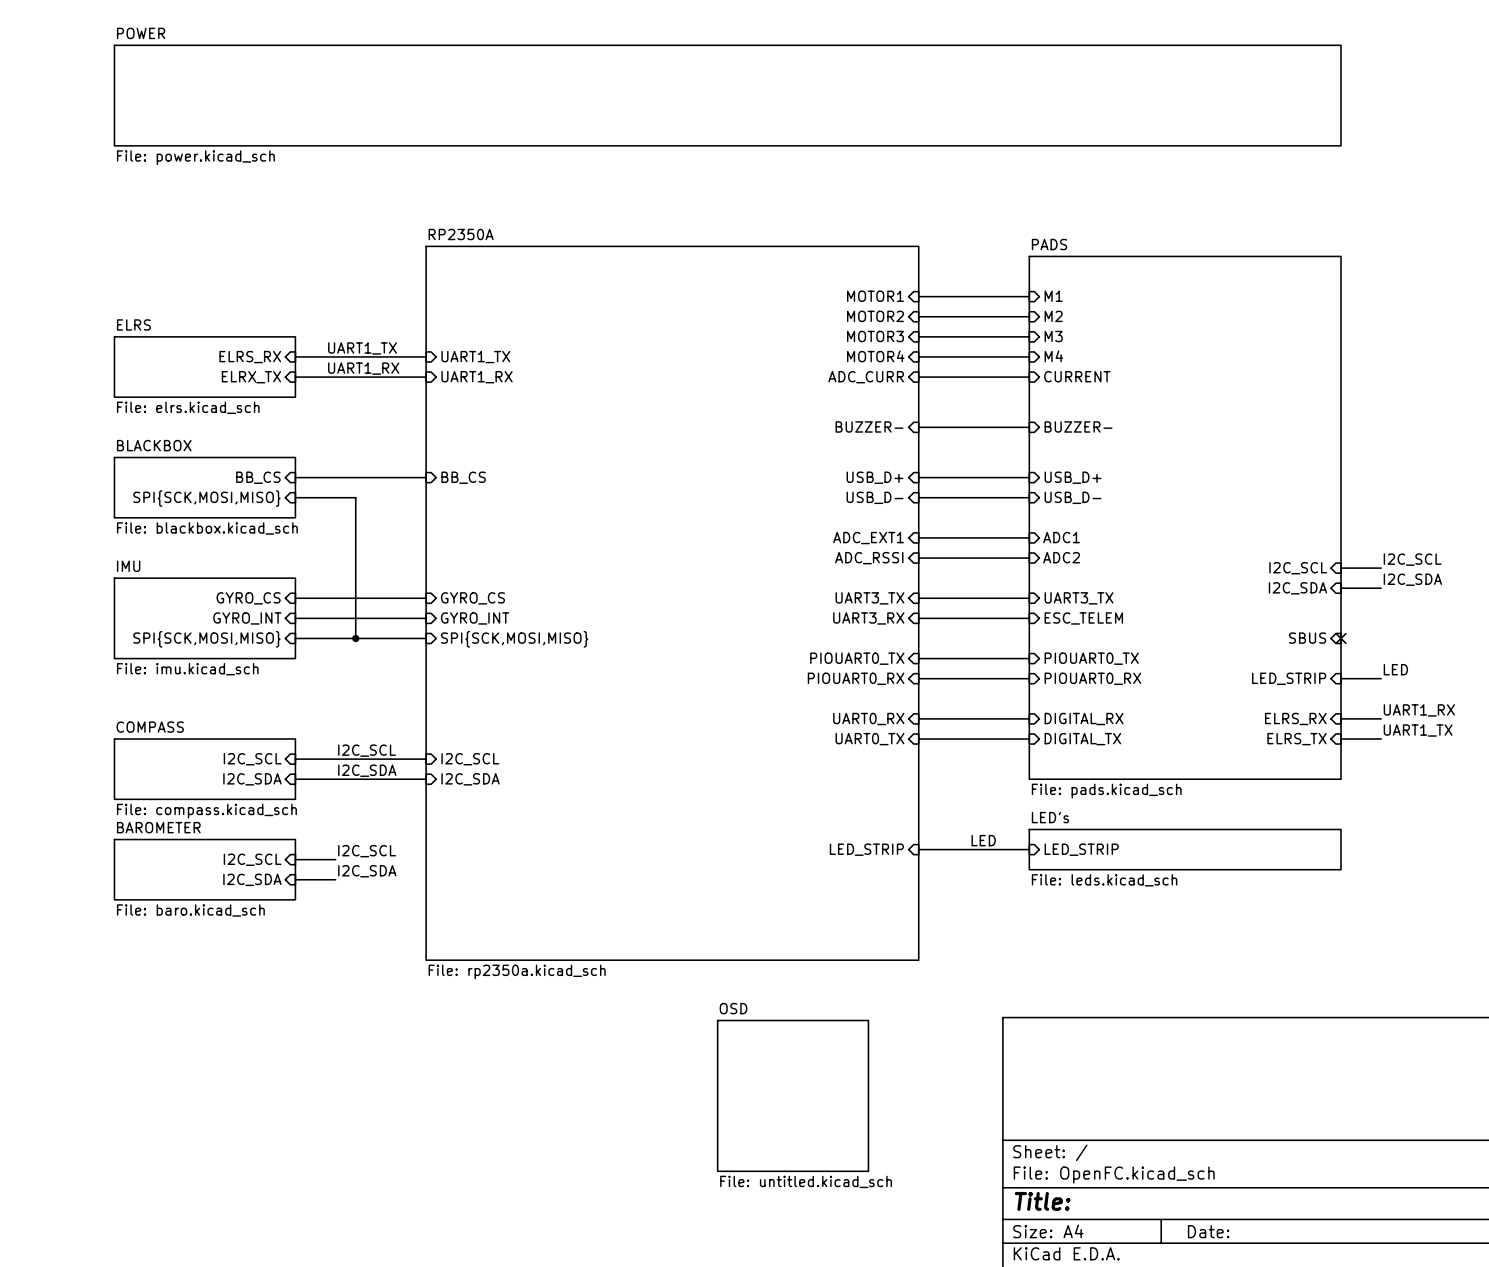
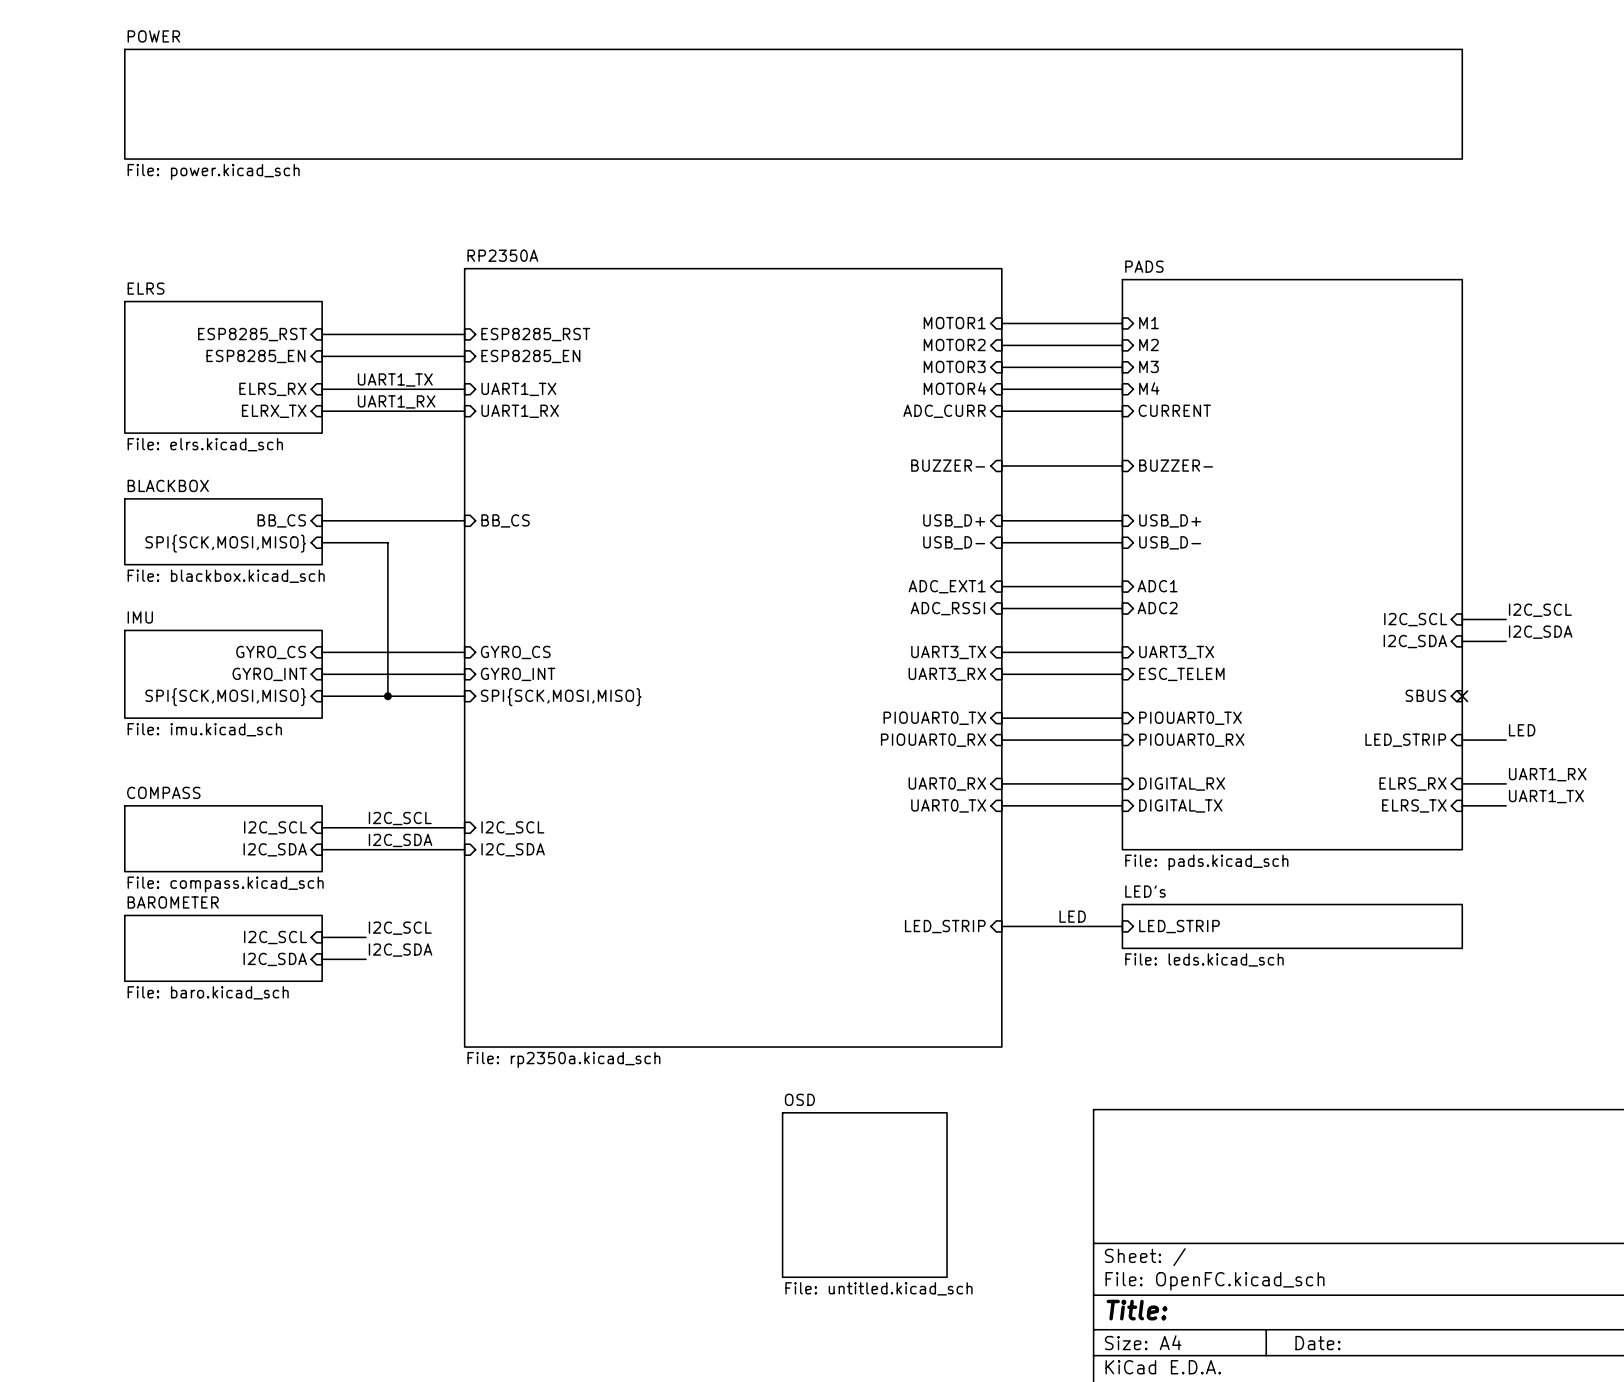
sheet pin: none -> ESP8285_RST (252, 334)
wire: none -> (322, 334) (464, 334)
sheet pin: none -> ESP8285_RST (535, 334)
sheet pin: none -> ESP8285_EN (255, 356)
wire: none -> (322, 356) (464, 356)
sheet pin: none -> ESP8285_EN (530, 356)
sheet ELRS: none -> File: elrs.kicad_sch (223, 367)
sheet ELRS: File: elrs.kicad_sch (204, 367) -> none

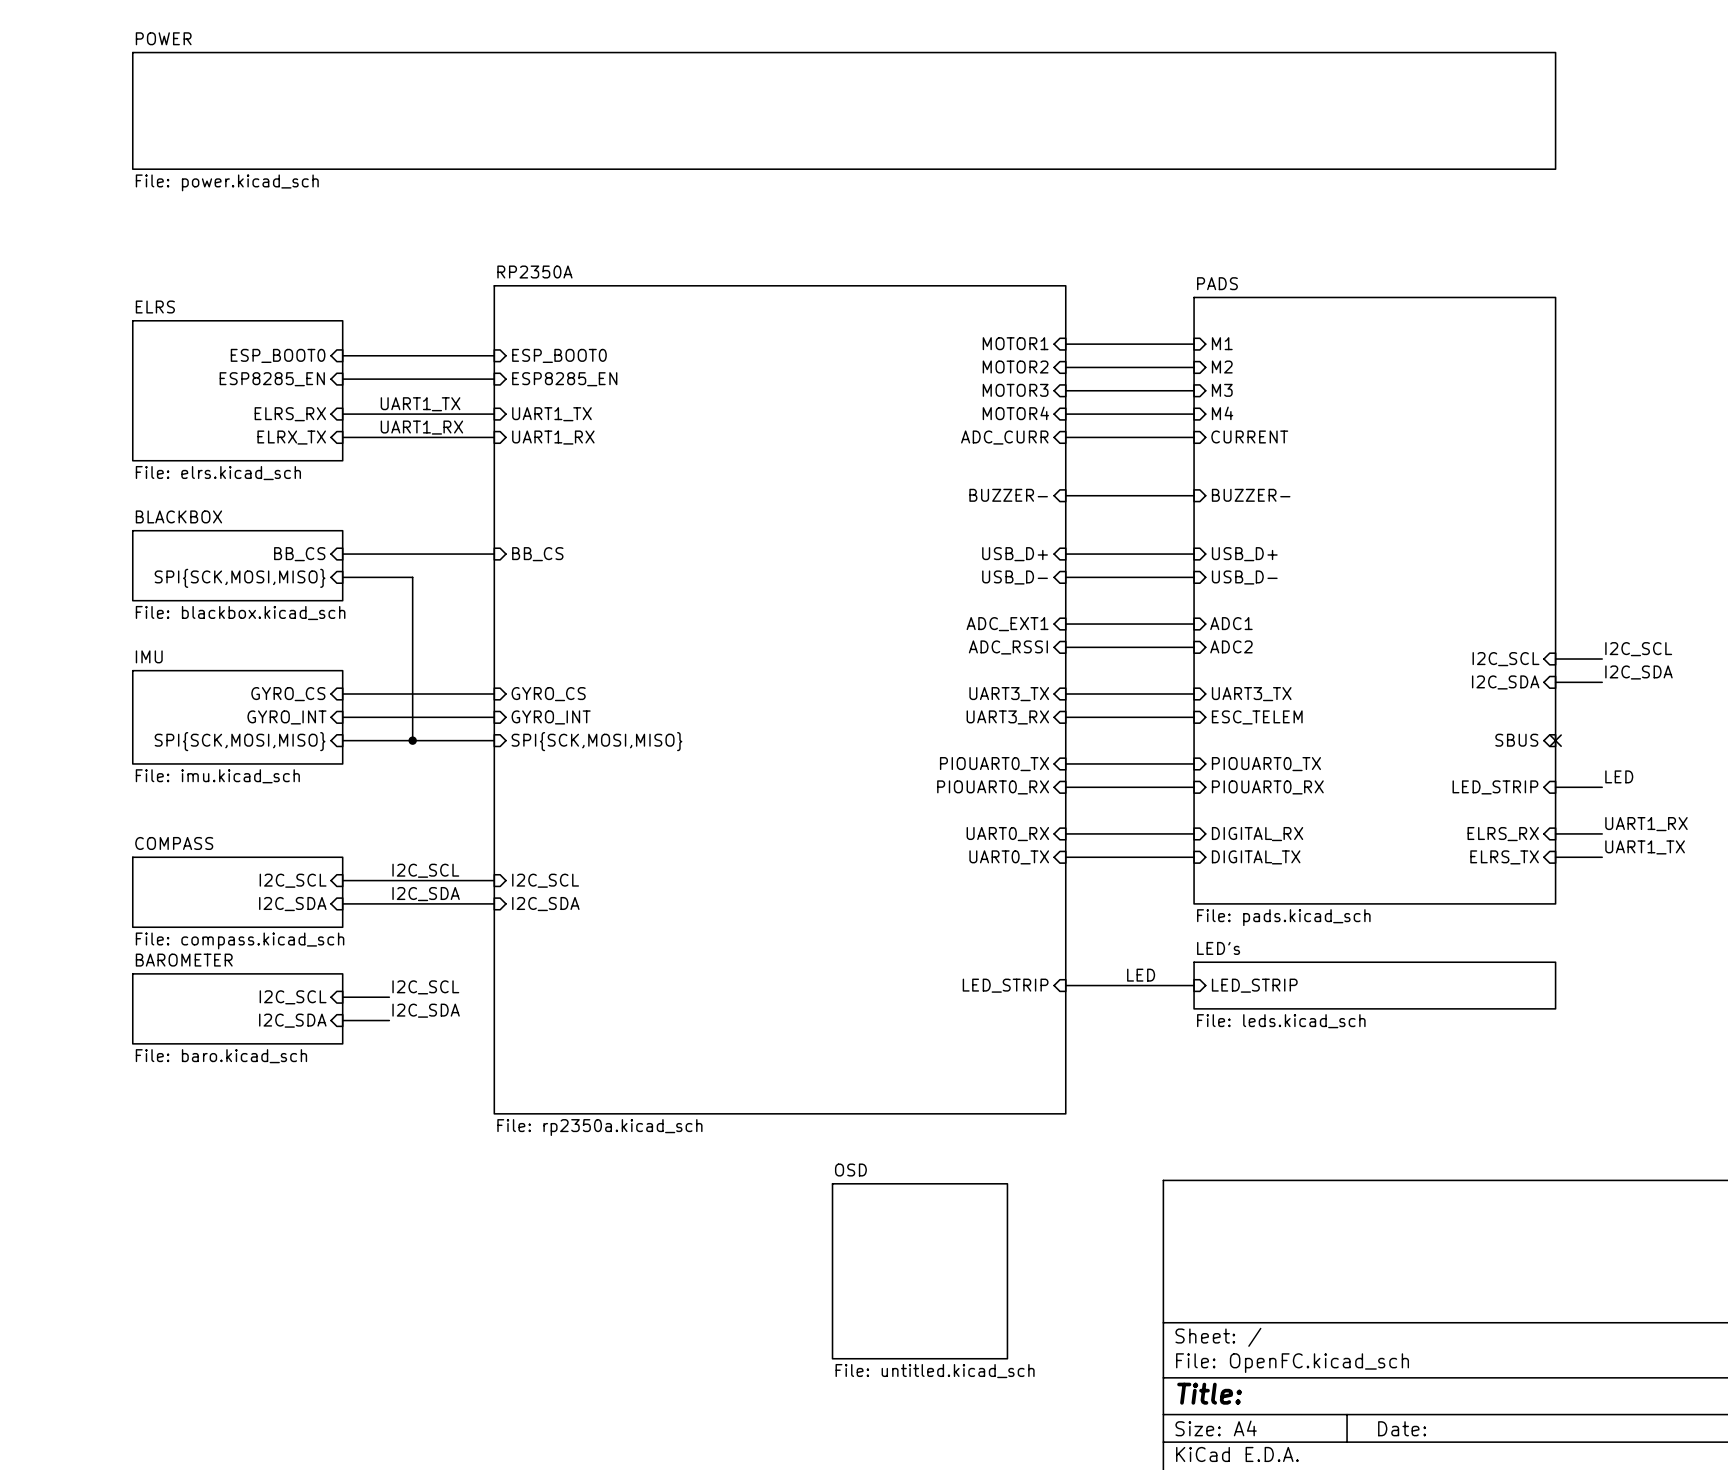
sheet pin: ESP8285_RST (252, 334) -> ESP_BOOT0 (278, 355)
sheet pin: ESP8285_RST (535, 334) -> ESP_BOOT0 (559, 355)

